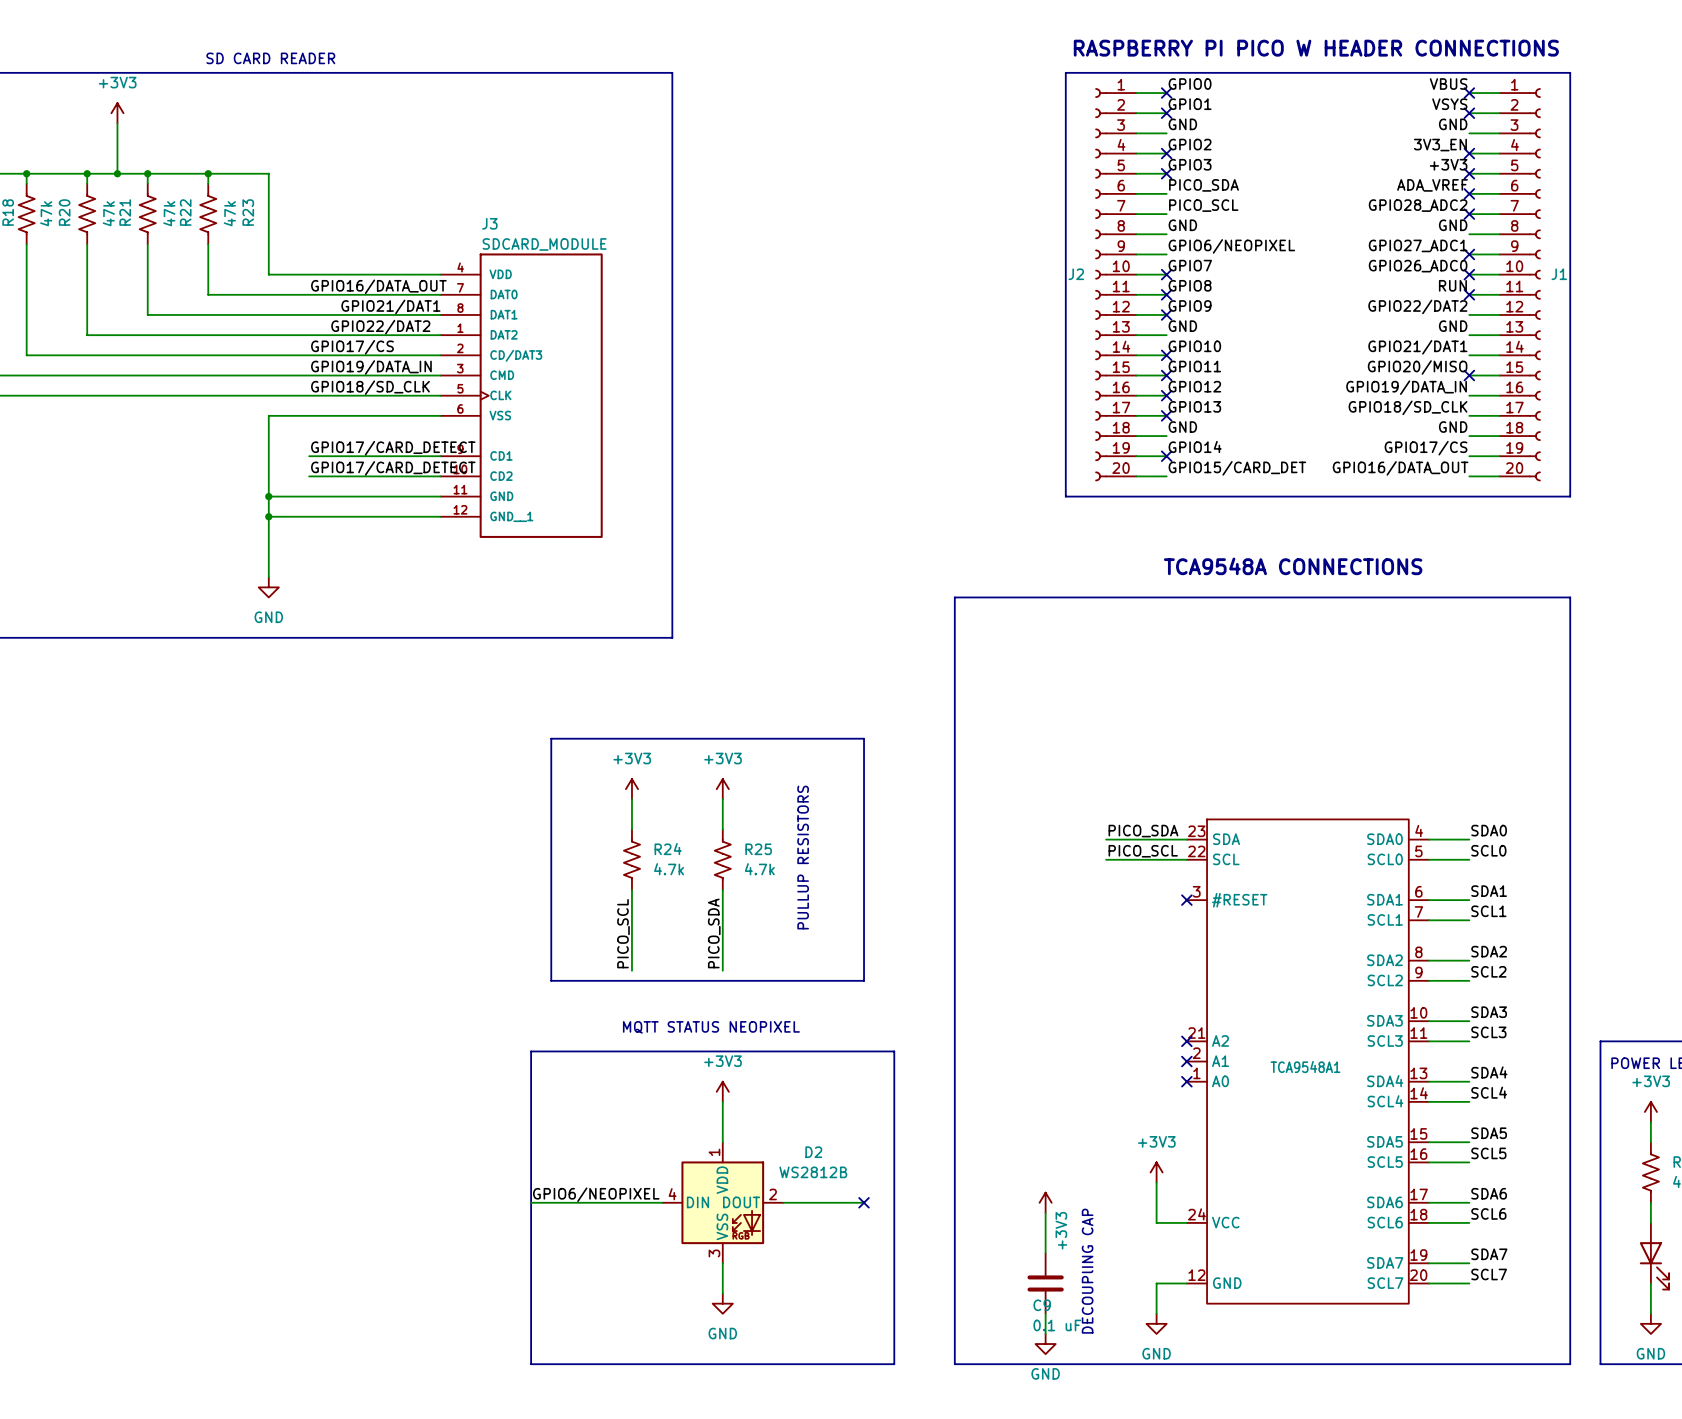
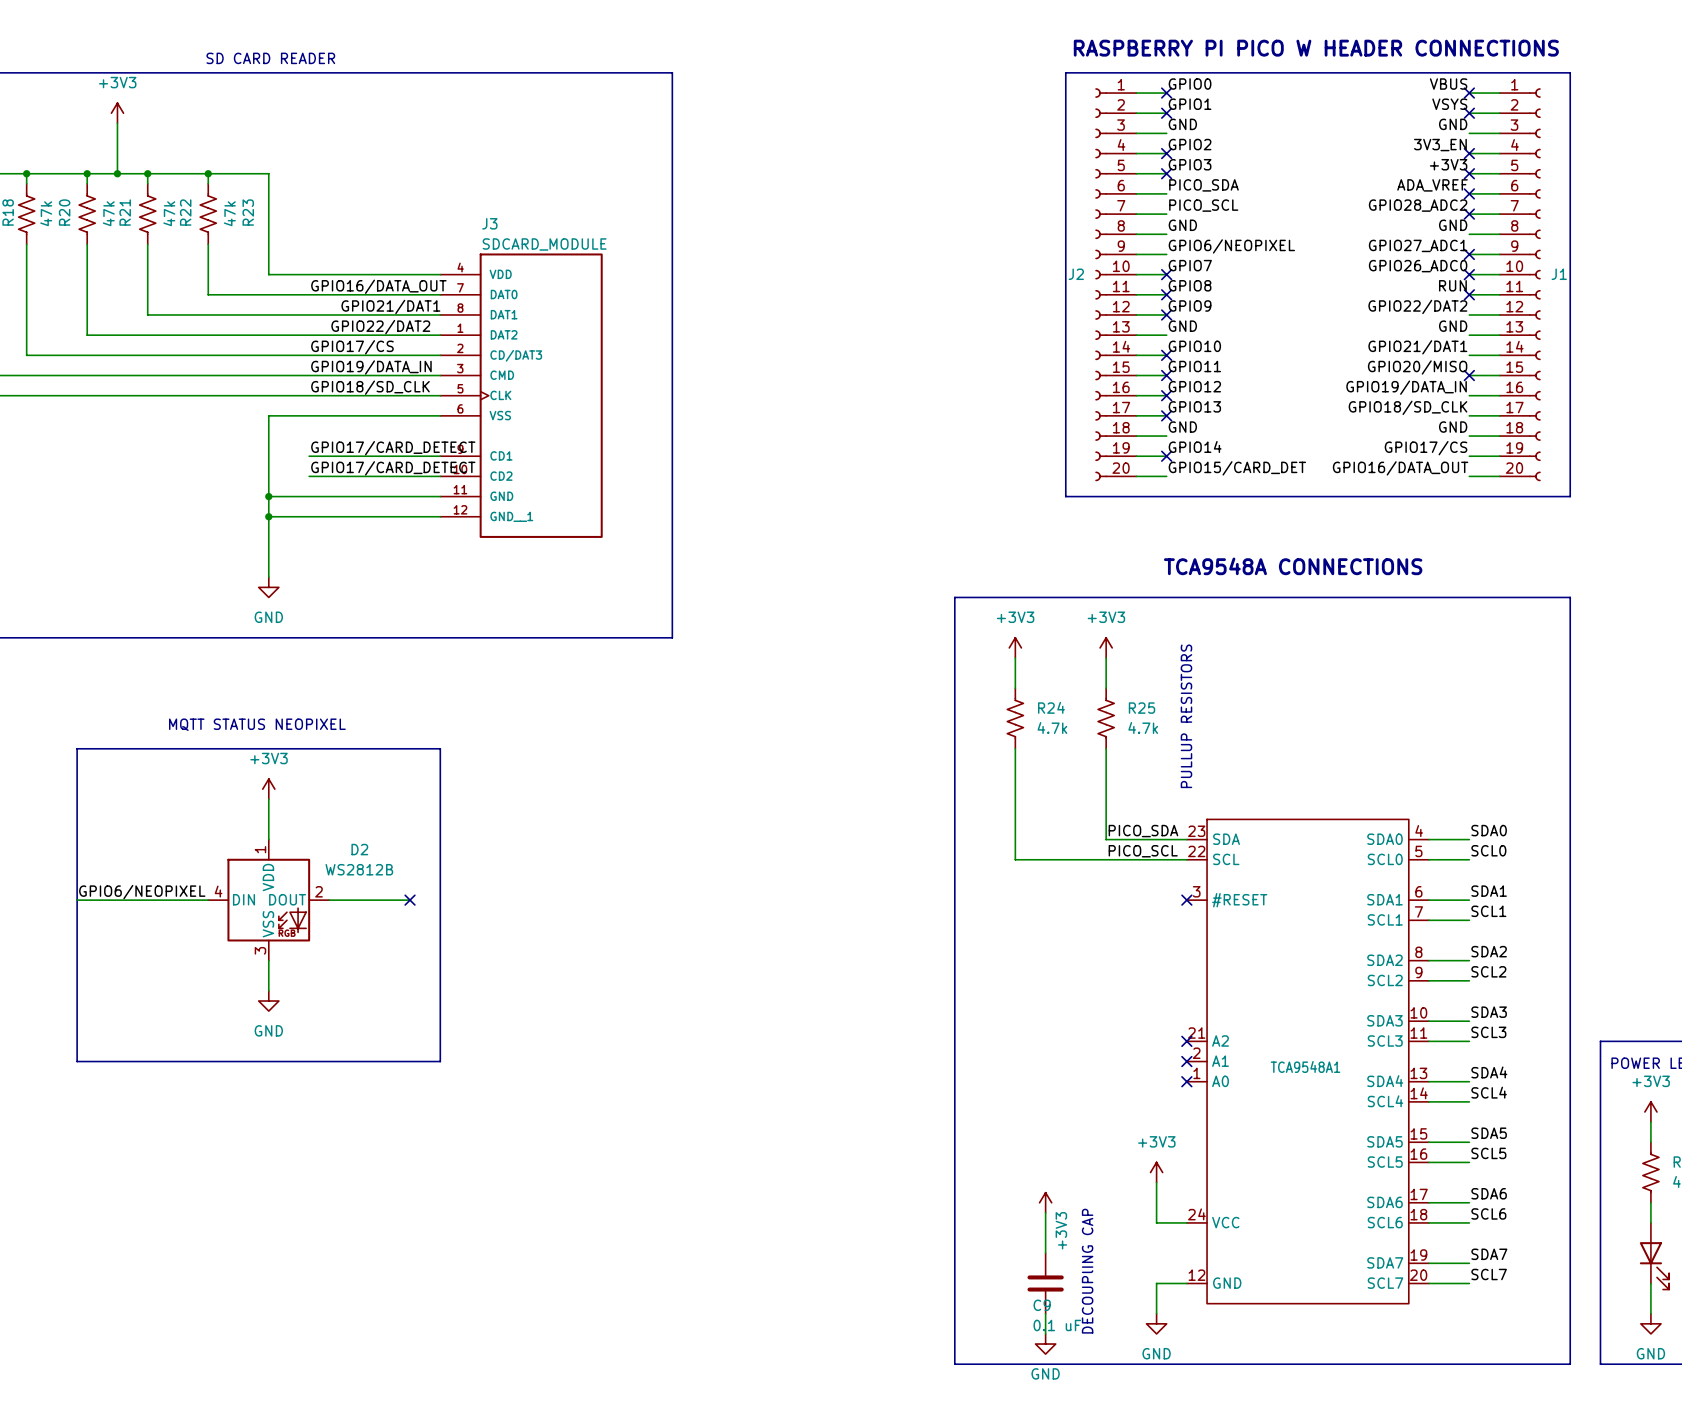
power symbol: none -> +3V3 (1015, 647)
power symbol: none -> +3V3 (1106, 647)
wire: none -> (1015, 658) (1015, 688)
wire: none -> (1106, 658) (1106, 688)
text: none -> PULLUP RESISTORS (1186, 716)
text: none -> MQTT STATUS NEOPIXEL (257, 724)
line: (551, 738) (864, 738) (864, 980) (551, 980) (551, 738) -> none
line: none -> (77, 748) (440, 748) (440, 1061) (77, 1061) (77, 748)
wire: none -> (1015, 748) (1015, 859) (1106, 859)
wire: none -> (1106, 748) (1106, 839)
power symbol: none -> +3V3 (268, 789)
power symbol: +3V3 (631, 789) -> none
power symbol: +3V3 (722, 789) -> none
wire: none -> (268, 799) (268, 839)
wire: (631, 799) (631, 829) -> none
wire: (722, 799) (722, 829) -> none
text: PULLUP RESISTORS (803, 857) -> none
R24 position: (631, 859) -> (1015, 718)
R25 position: (722, 859) -> (1106, 718)
wire: (631, 890) (631, 970) -> none
wire: (722, 890) (722, 970) -> none
label: none -> GPIO6/NEOPIXEL (142, 892)
wire: none -> (77, 900) (208, 900)
wire: none -> (329, 900) (410, 900)
no-connect mark: none -> (410, 900)
label: PICO_SCL (623, 933) -> none
label: PICO_SDA (714, 933) -> none
wire: none -> (268, 960) (268, 990)
power symbol: none -> GND (268, 1001)
text: MQTT STATUS NEOPIXEL (711, 1027) -> none
line: (531, 1051) (894, 1051) (894, 1364) (531, 1364) (531, 1051) -> none
power symbol: +3V3 (722, 1091) -> none
wire: (722, 1101) (722, 1142) -> none
D2 symbol: [662, 1142, 784, 1264] -> [208, 839, 330, 961]
label: GPIO6/NEOPIXEL (596, 1194) -> none
wire: (531, 1202) (662, 1202) -> none
wire: (783, 1202) (864, 1202) -> none
no-connect mark: (864, 1202) -> none
wire: (722, 1263) (722, 1293) -> none
power symbol: GND (722, 1303) -> none

